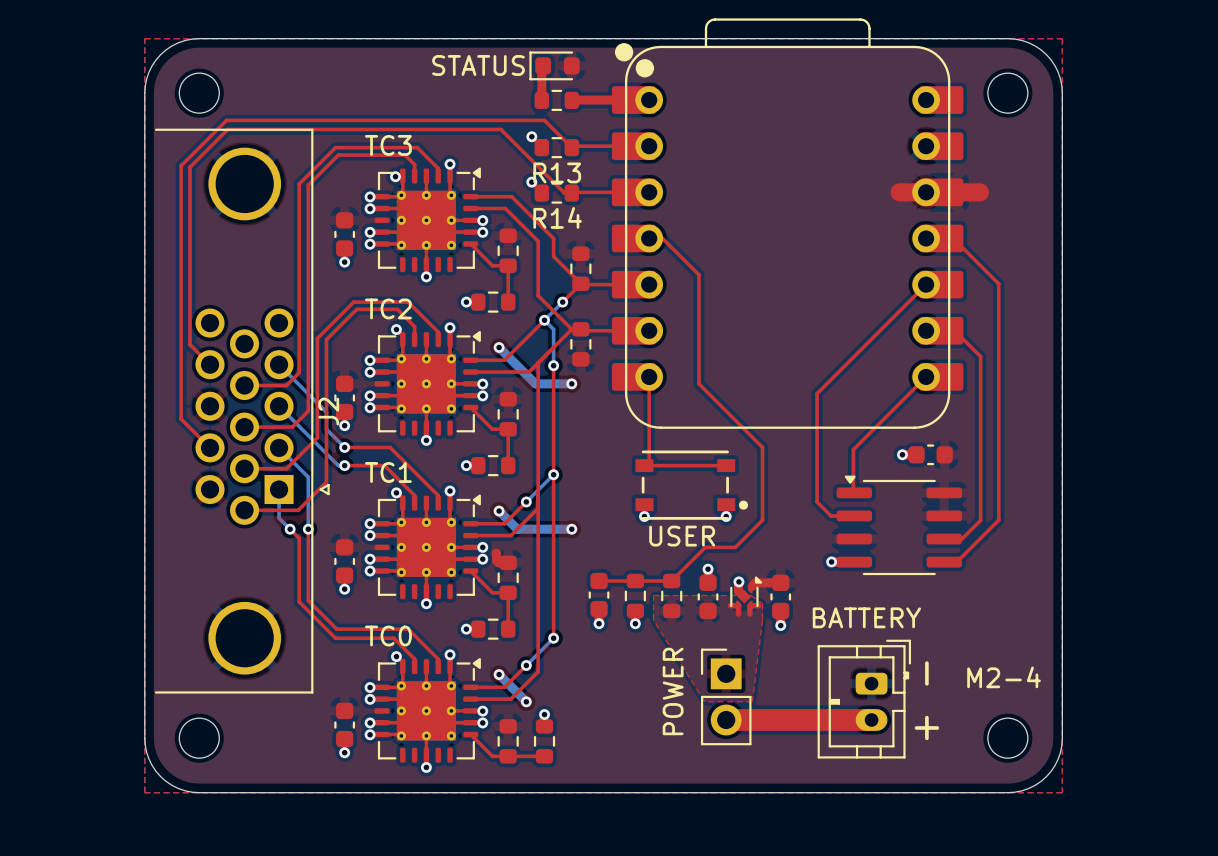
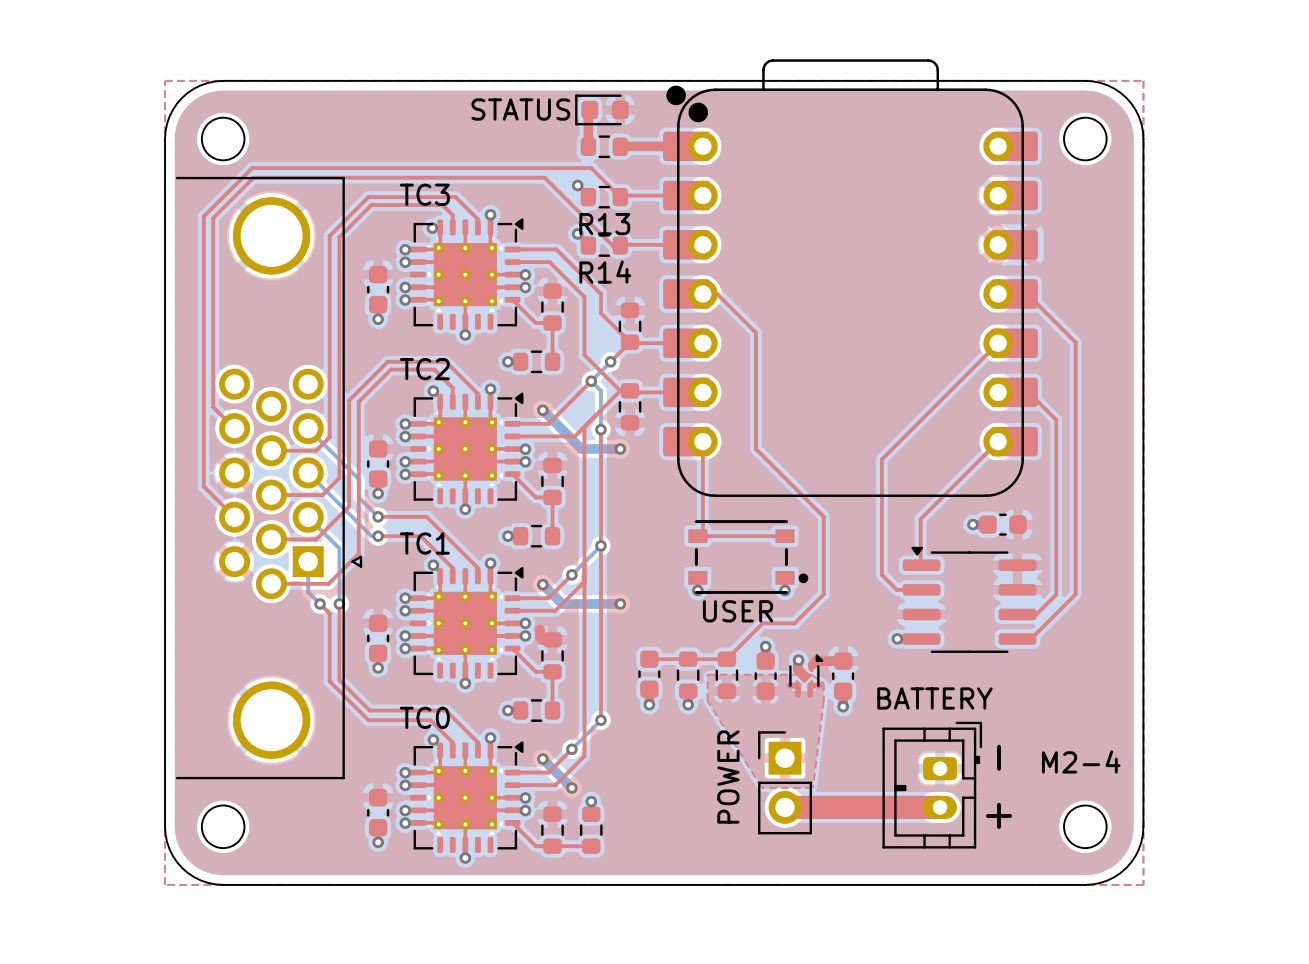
top track: (899, 192) (979, 192) -> none
J2 name: J2 (328, 411) -> none

